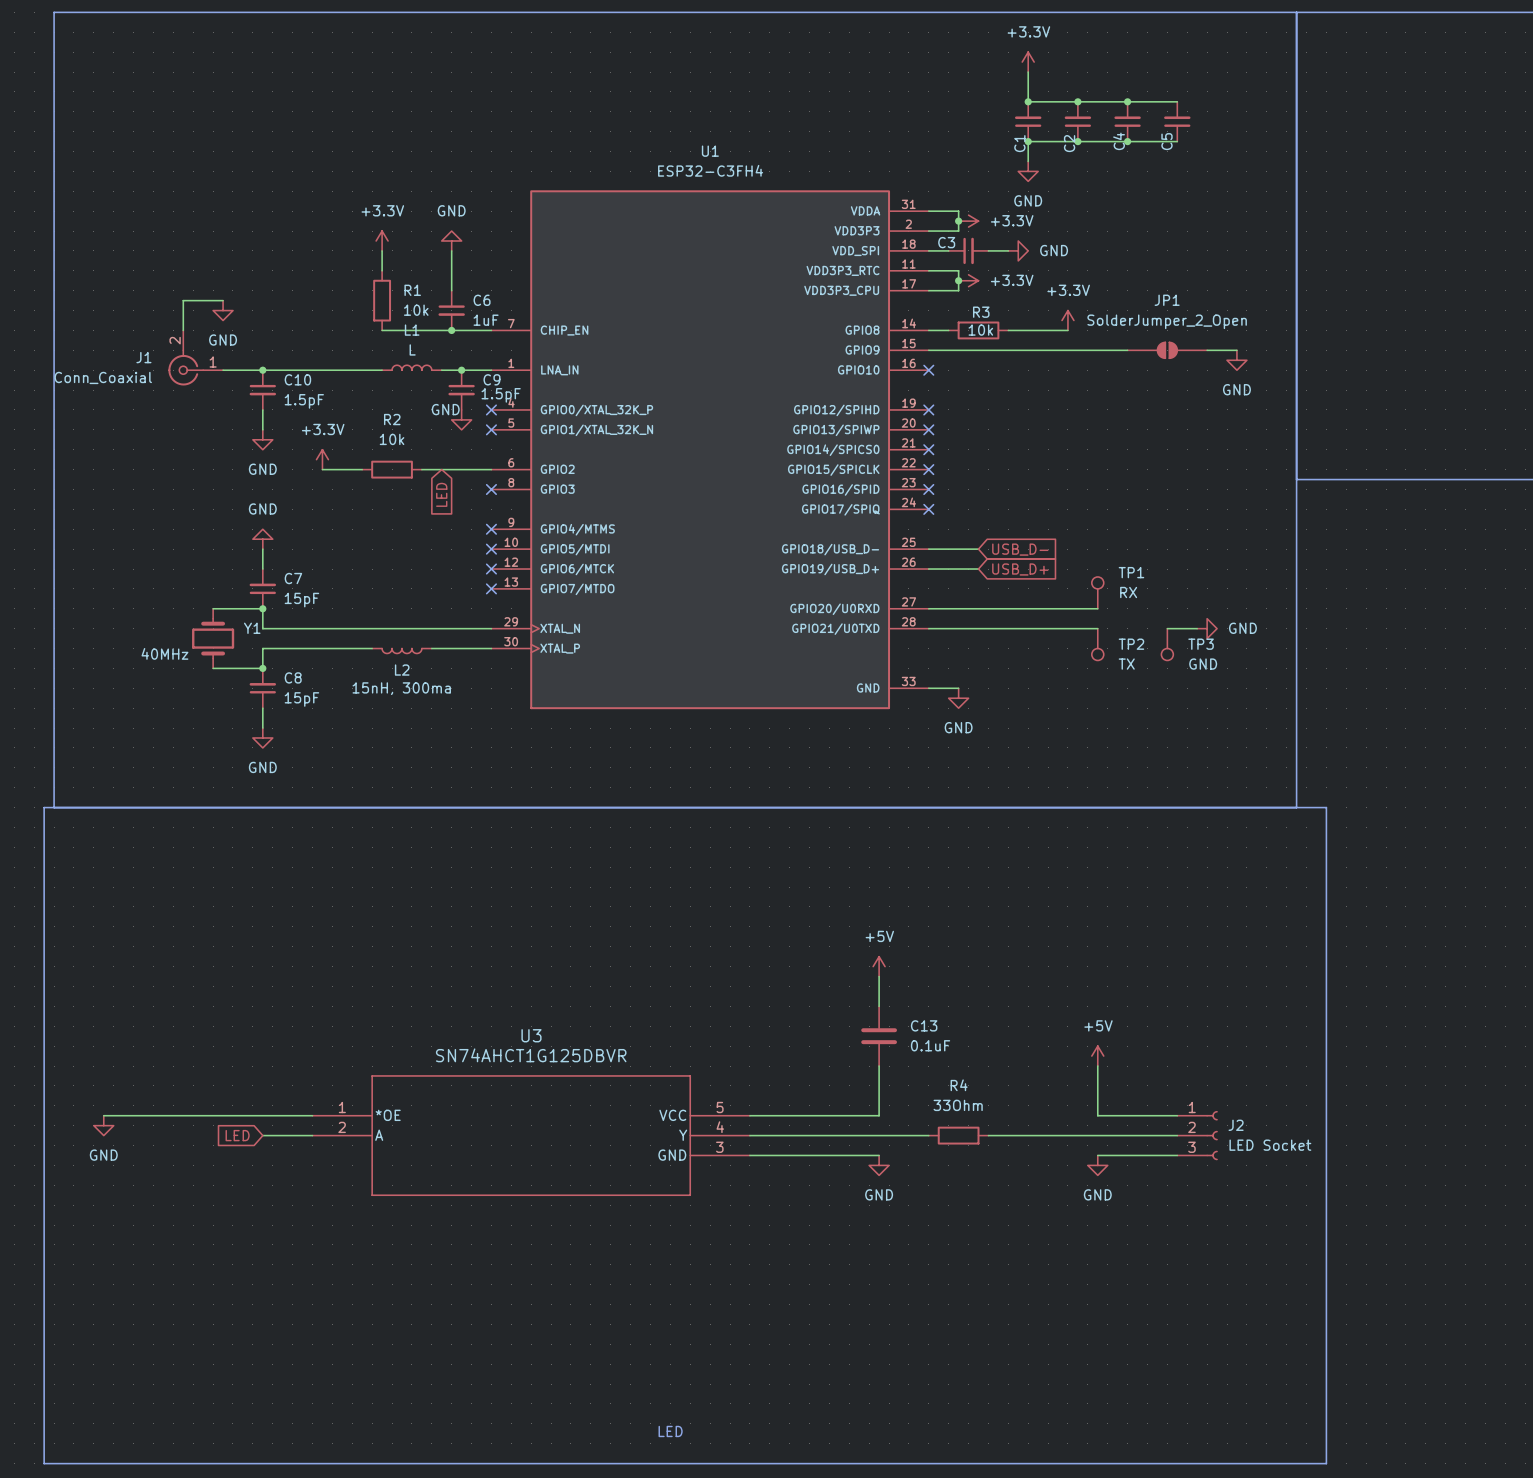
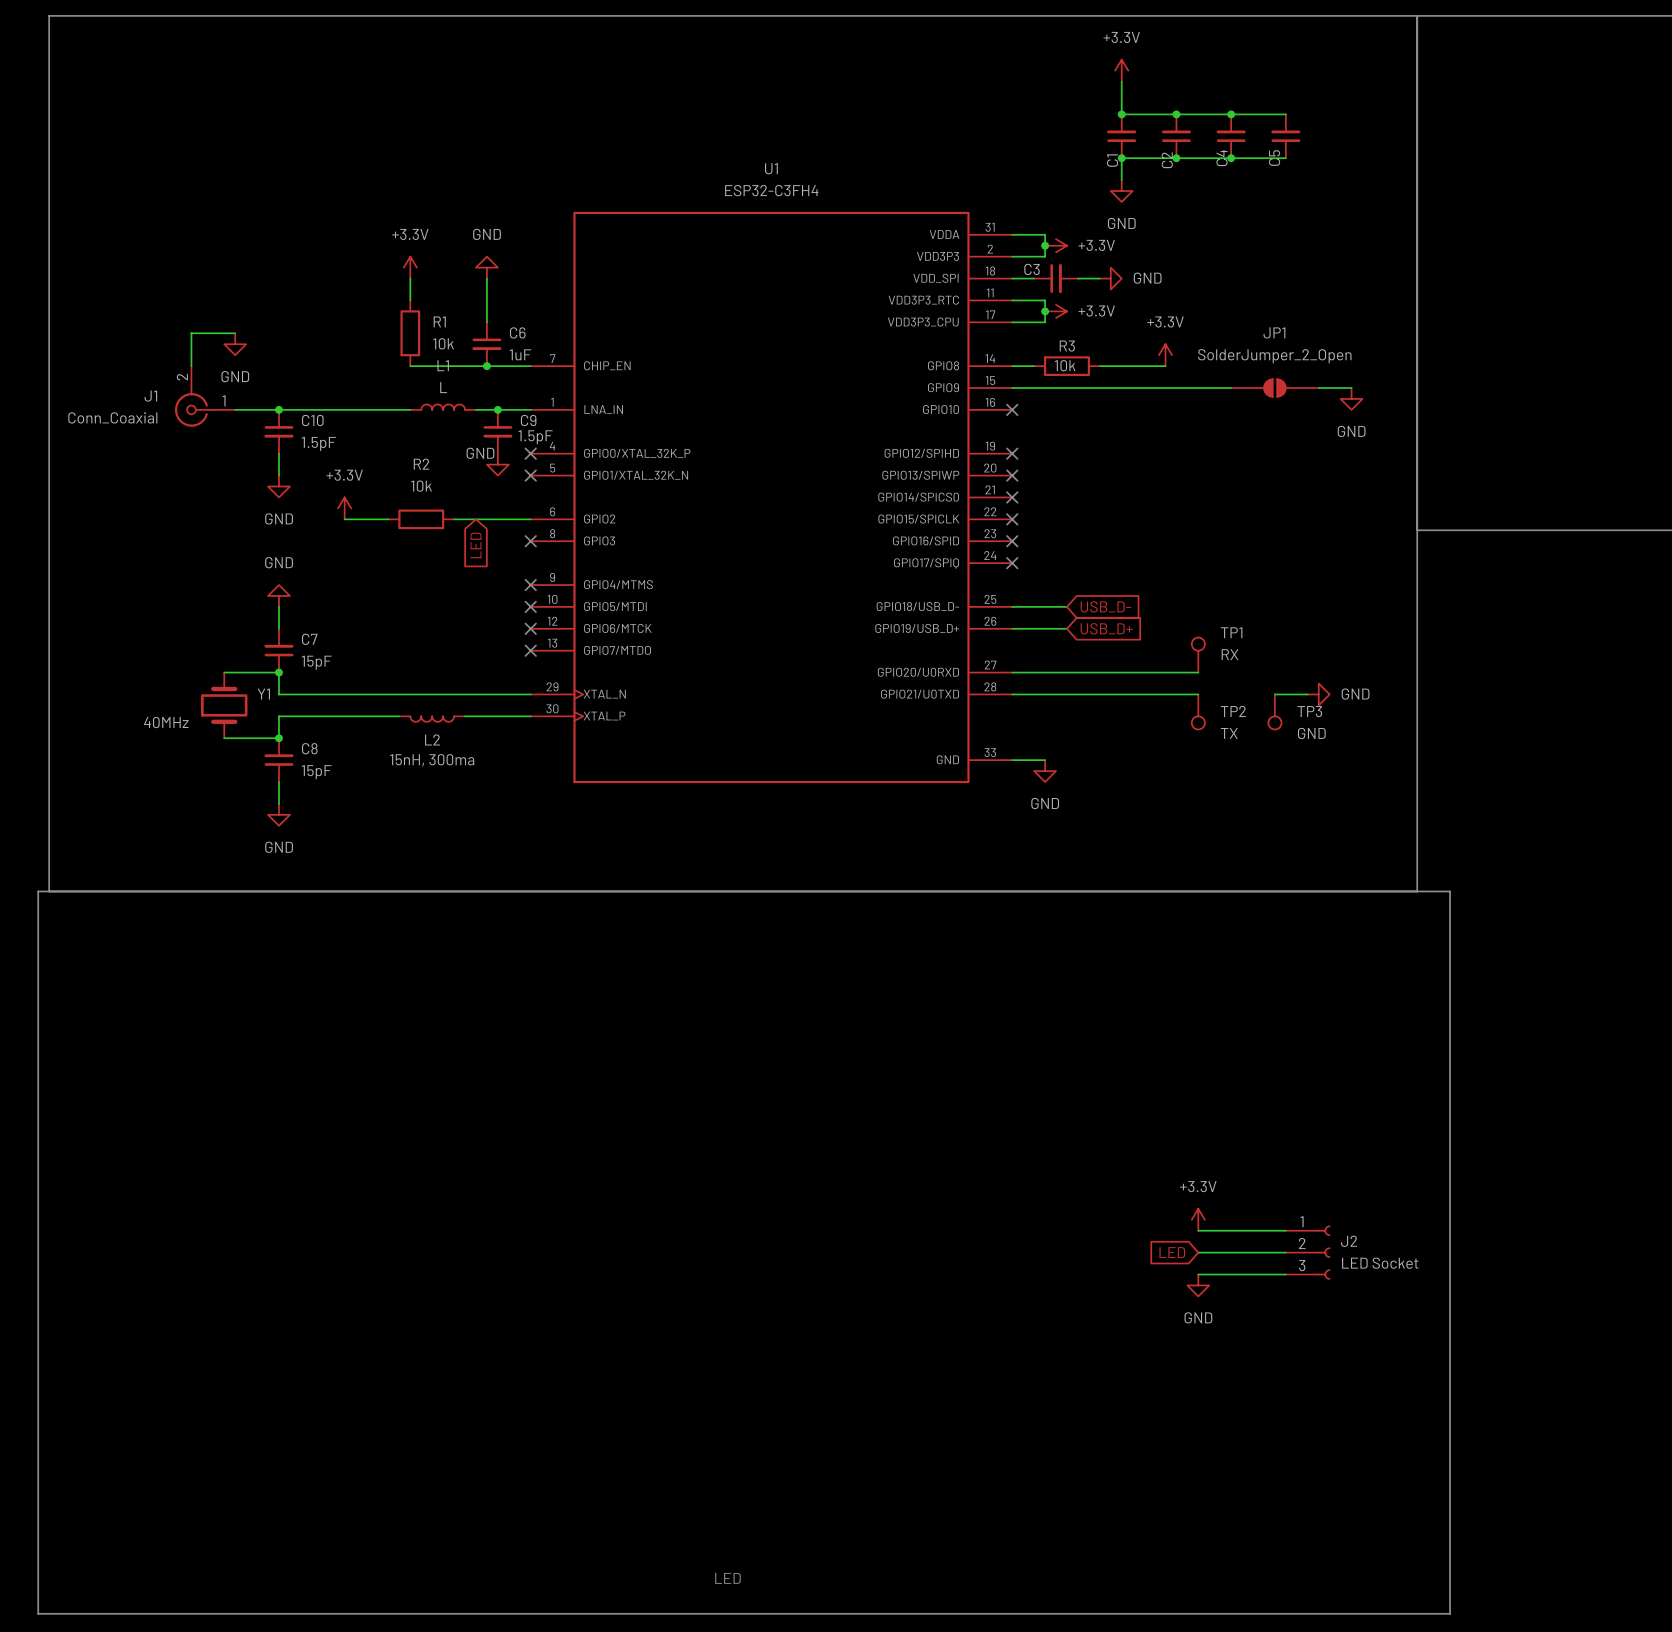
power symbol: +5V (879, 966) -> none
wire: (879, 976) (879, 1006) -> none
C13: 0.1uF (879, 1036) -> none
power symbol: +5V (1097, 1056) -> none
wire: (879, 1066) (879, 1115) (749, 1115) -> none
wire: (1097, 1066) (1097, 1115) -> none
power symbol: none -> +3.3V (1198, 1219)
wire: (103, 1115) (312, 1115) -> none
power symbol: GND (103, 1125) -> none
global label: LED (237, 1135) -> none
wire: (262, 1135) (312, 1135) -> none
U3: SN74AHCT1G125DBVR (531, 1135) -> none
wire: (749, 1135) (928, 1135) -> none
R4: 33Ohm (958, 1135) -> none
wire: (988, 1135) (1097, 1135) -> none
global label: none -> LED (1172, 1252)
wire: (749, 1155) (879, 1155) -> none
power symbol: GND (879, 1165) -> none

